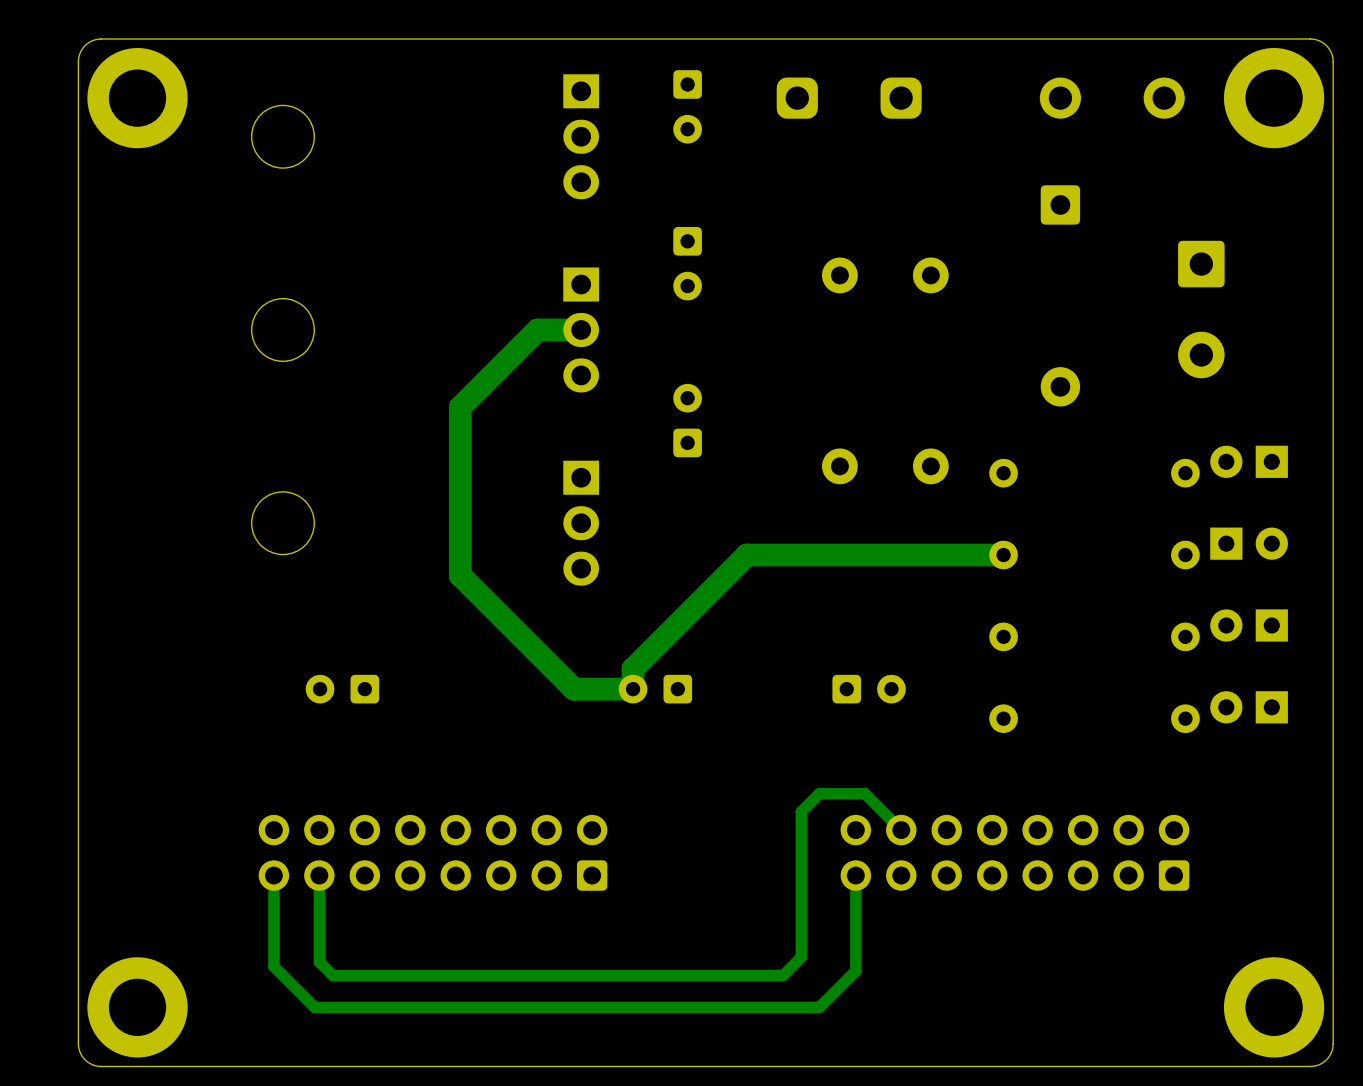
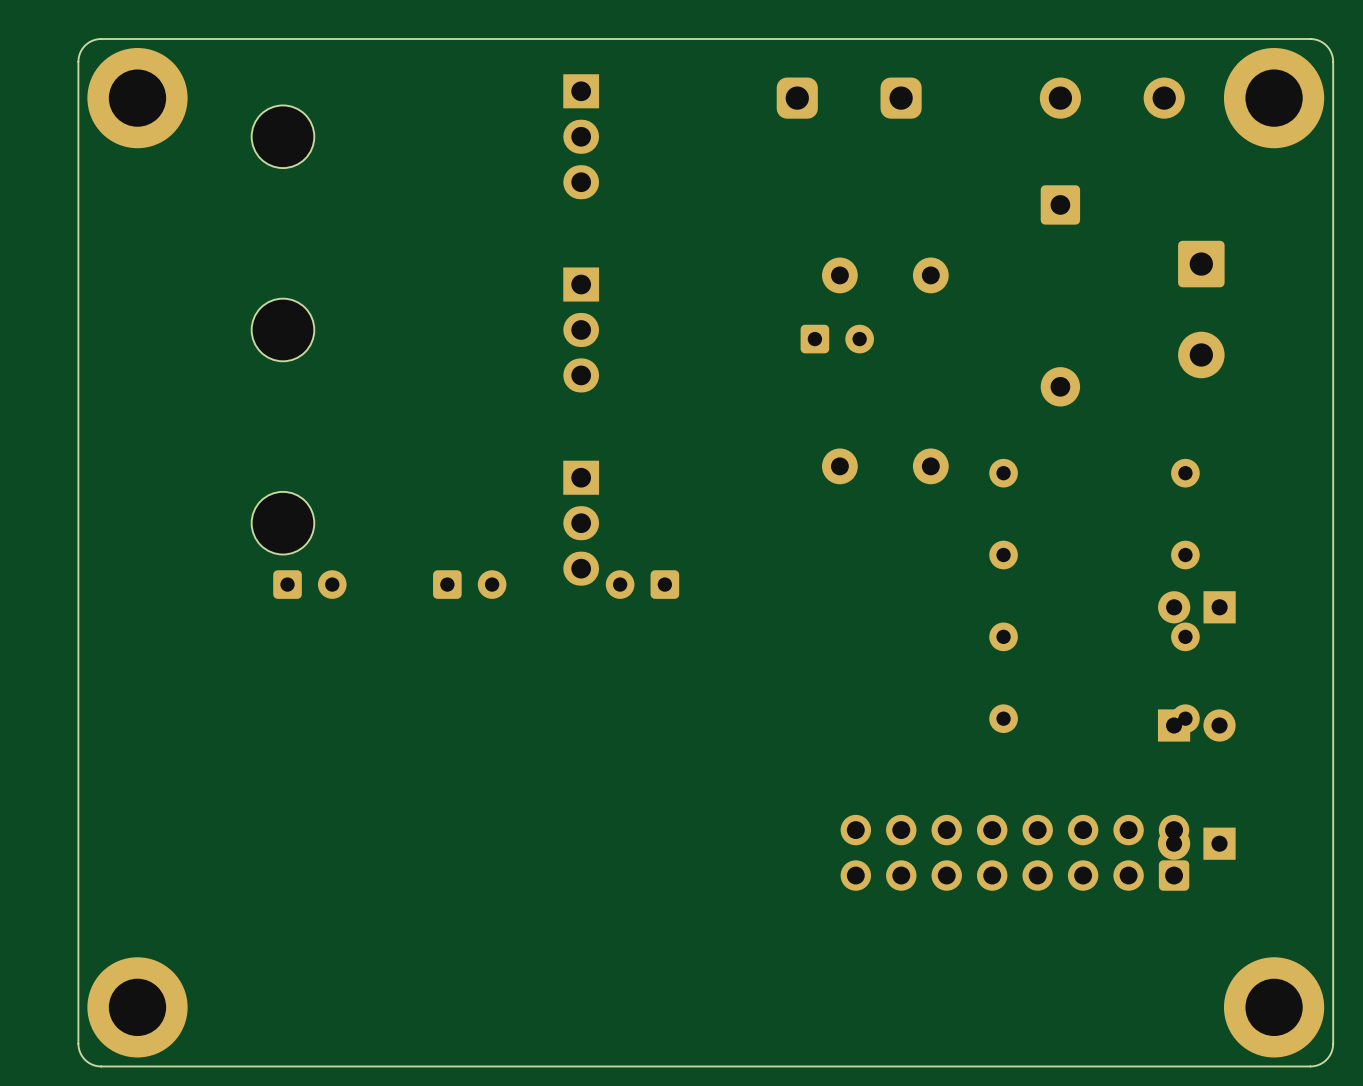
part: (687, 106) -> none
part: (687, 263) -> none
track: (581, 329) (537, 329) (460, 407) (460, 575) (573, 689) (633, 689) (633, 668) (746, 555) (1003, 555) -> none
part: none -> (837, 339)
part: (687, 420) -> none
part: (1249, 461) -> none
part: (1249, 543) -> none
part: none -> (309, 584)
part: none -> (469, 584)
part: none -> (642, 584)
part: none -> (1196, 607)
part: (1249, 625) -> none
part: (342, 689) -> none
part: (655, 689) -> none
part: (869, 689) -> none
part rotation: 0° (1249, 707) -> 180° (1196, 725)
part position: (1249, 707) -> (1196, 725)
track: (901, 830) (864, 793) (819, 793) (801, 811) (801, 957) (783, 975) (332, 975) (319, 961) (319, 875) -> none
part: none -> (1196, 843)
part: (433, 852) -> none
track: (855, 875) (855, 971) (819, 1007) (314, 1007) (273, 966) (273, 875) -> none

